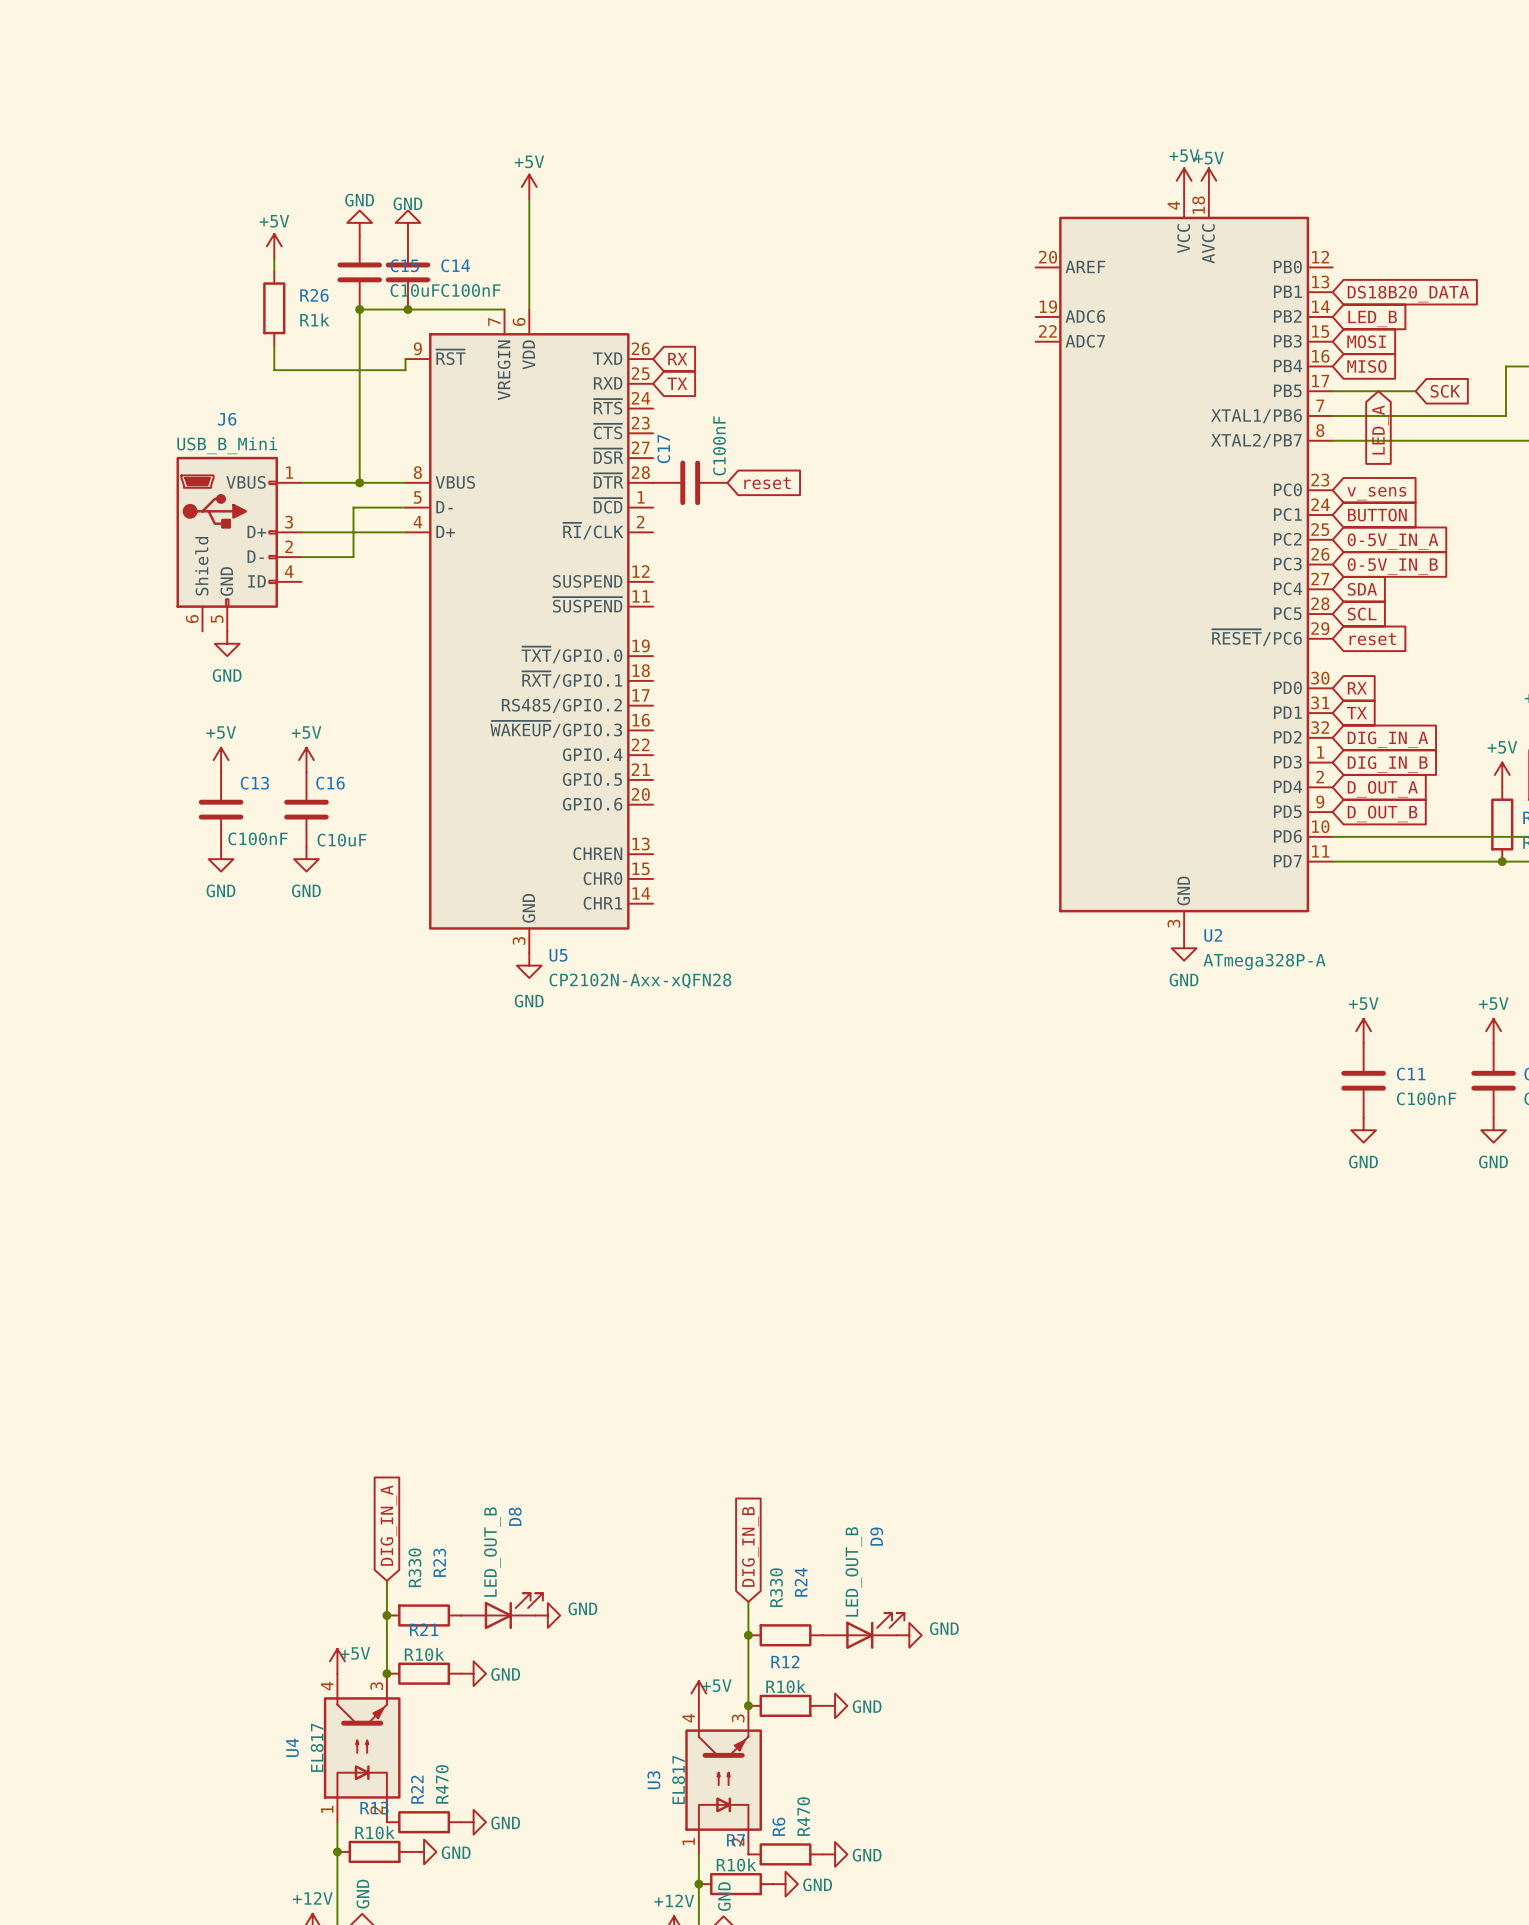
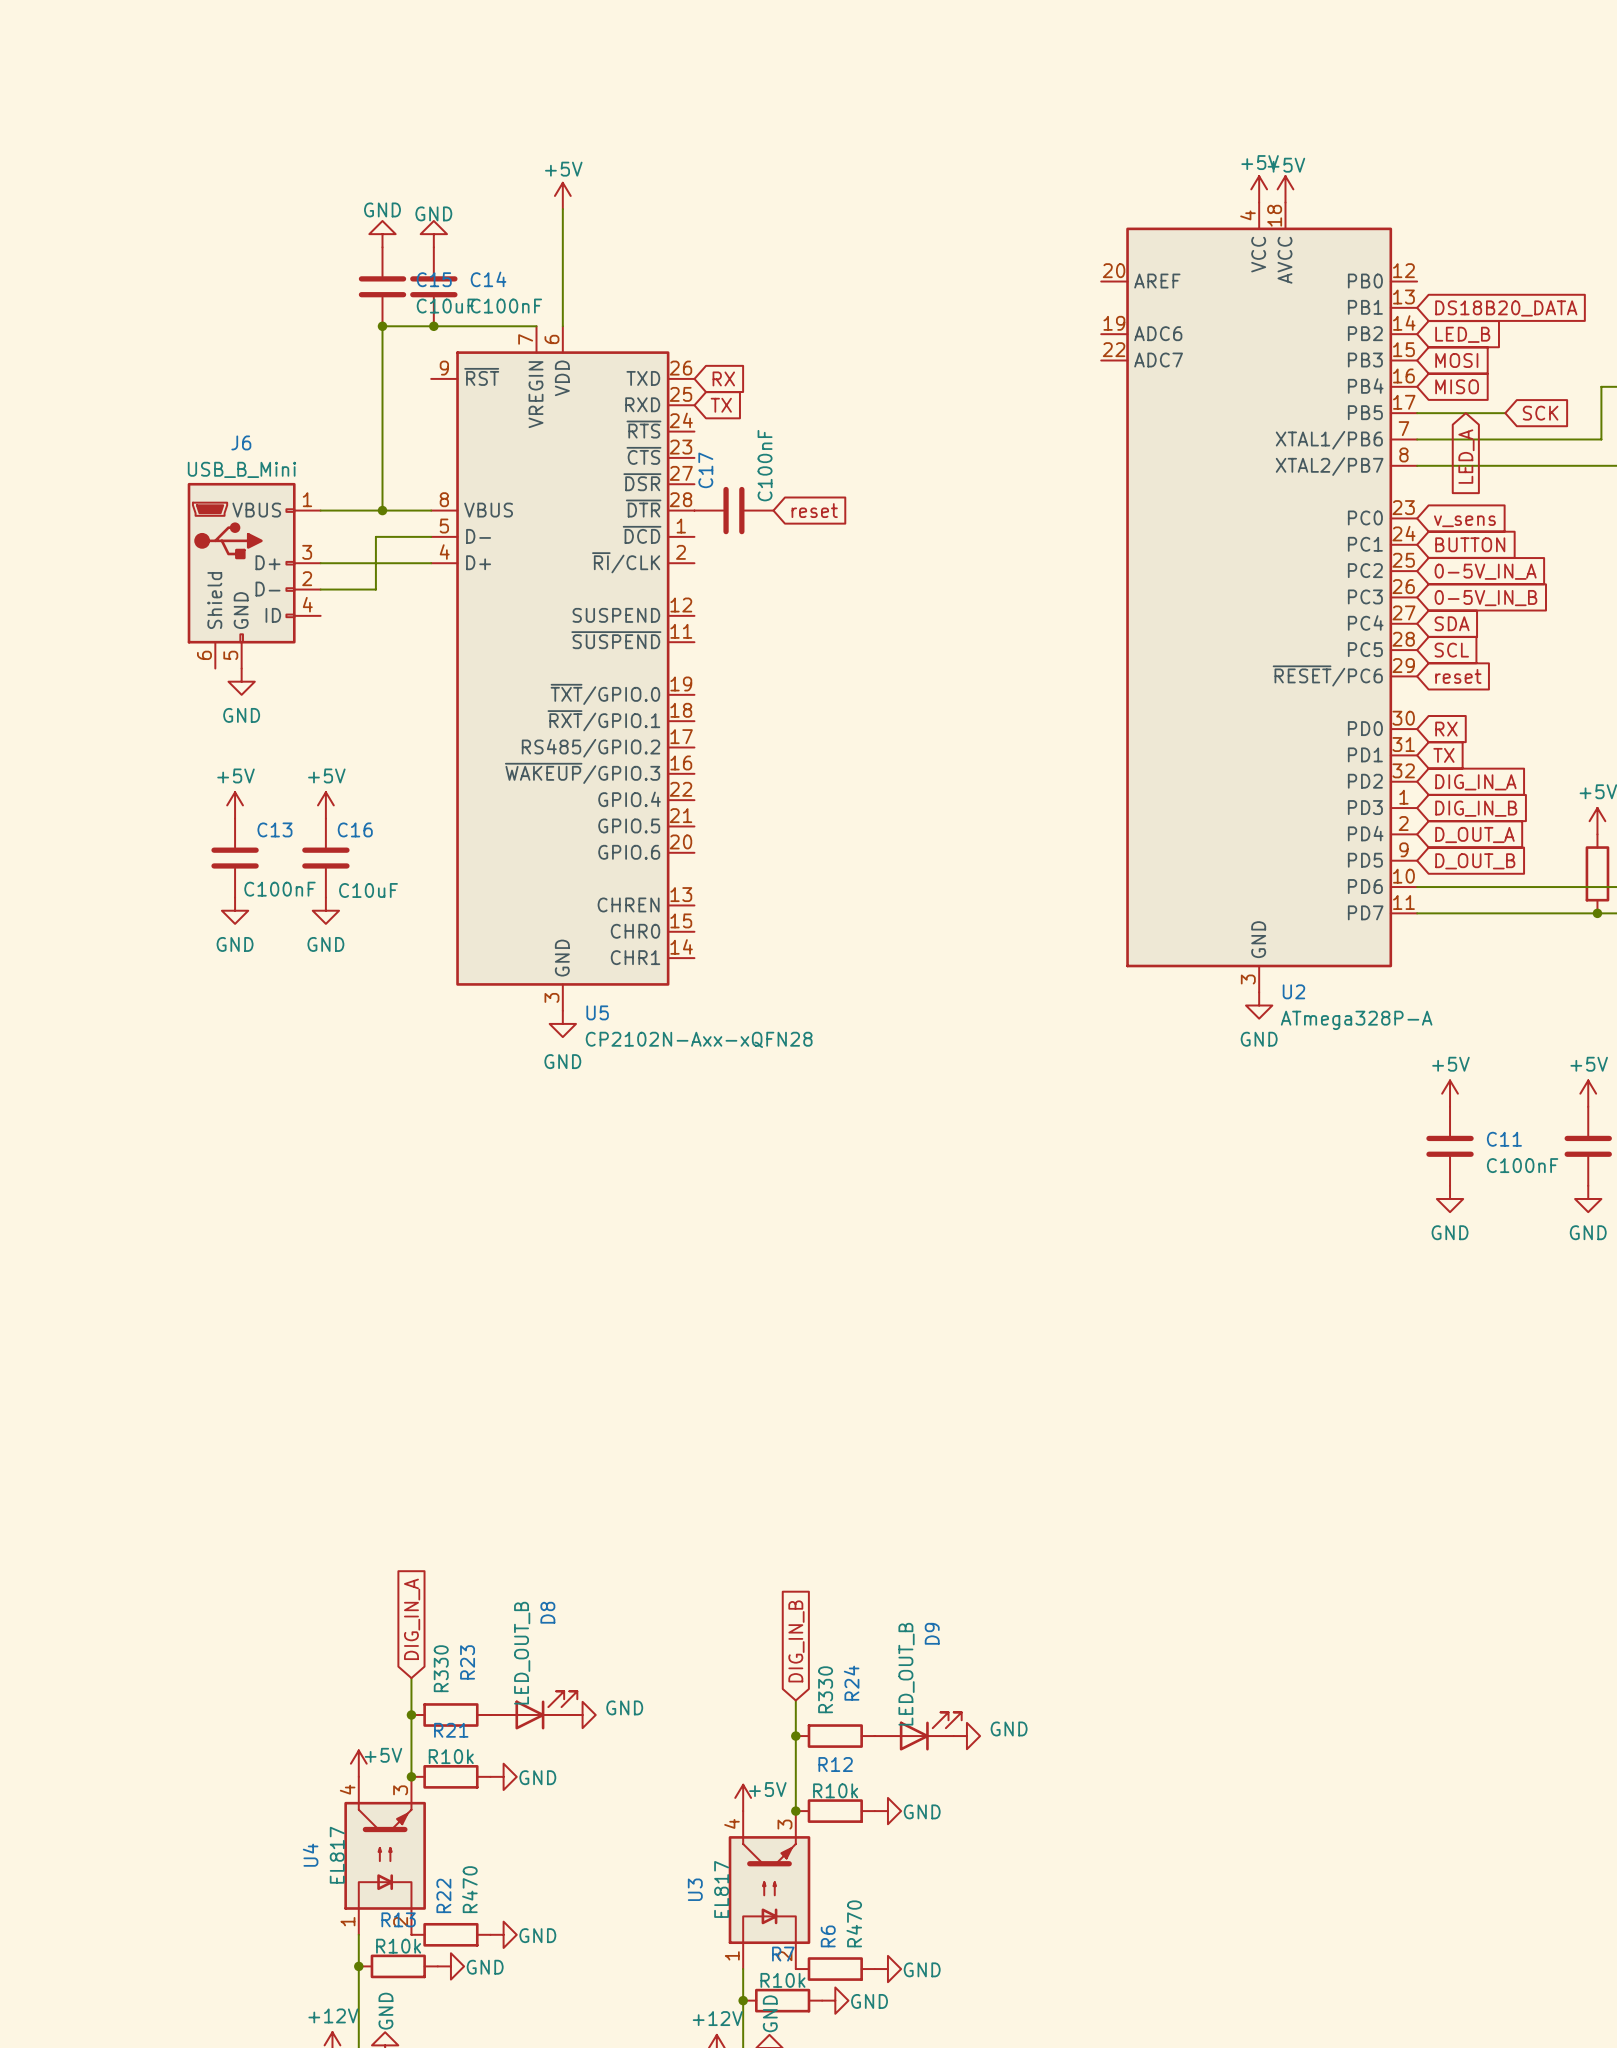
power symbol: +5V (274, 246) -> none
wire: (274, 258) (274, 271) -> none
R26: R1k (274, 308) -> none
wire: (274, 345) (274, 370) (405, 370) (405, 359) -> none

